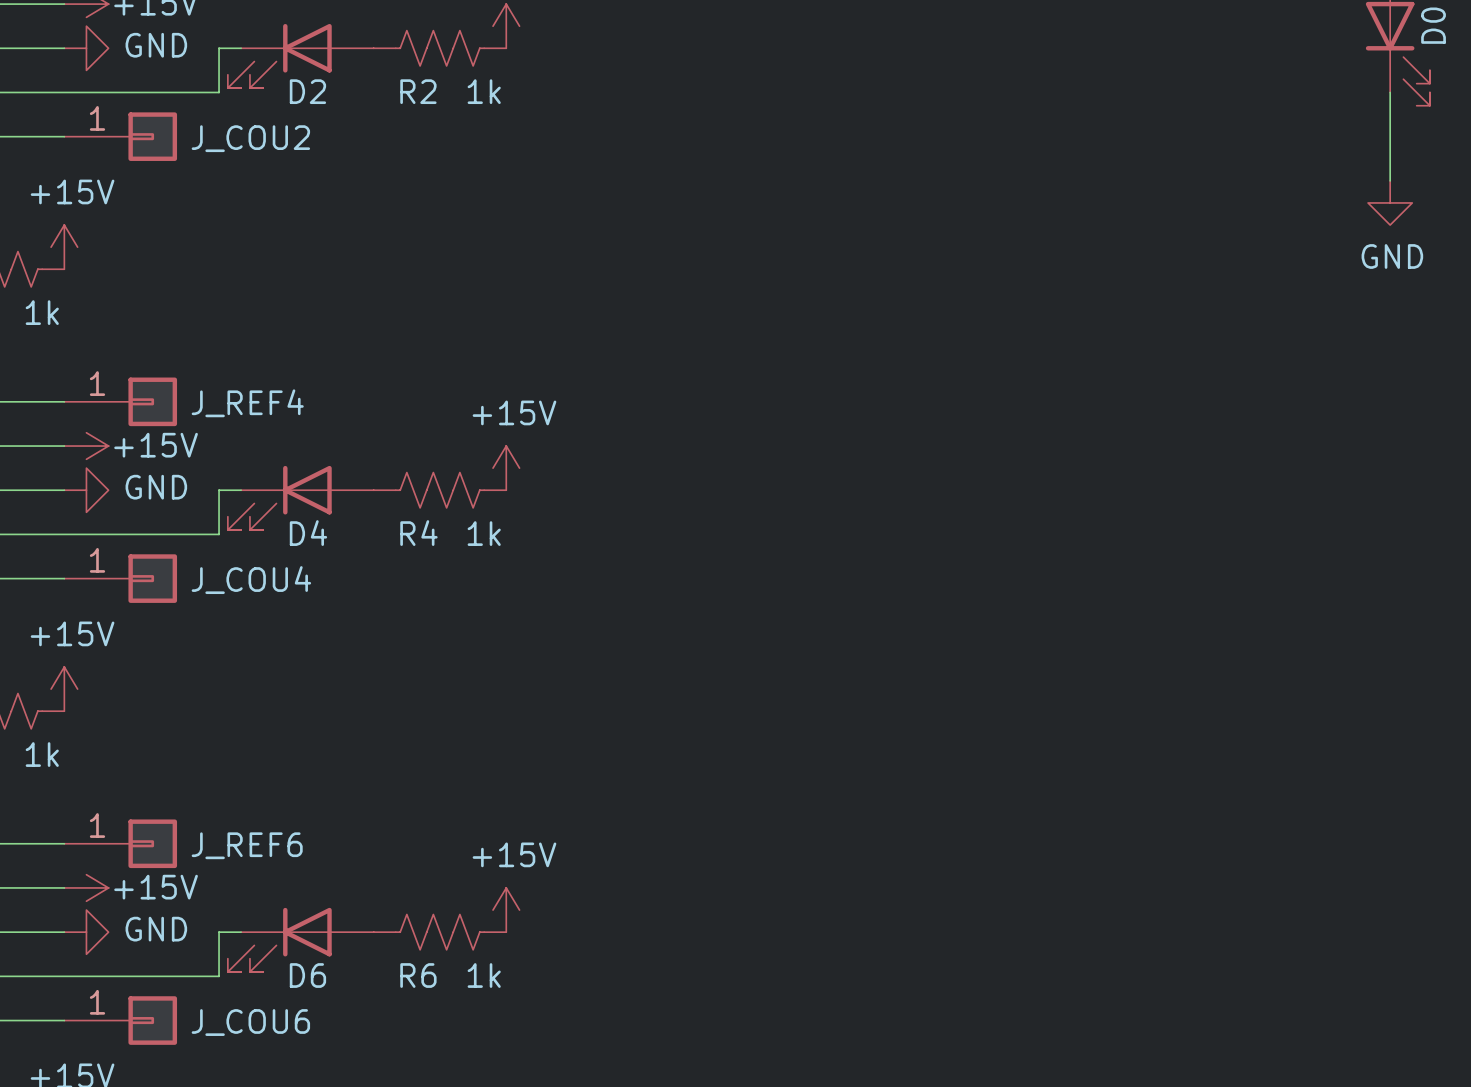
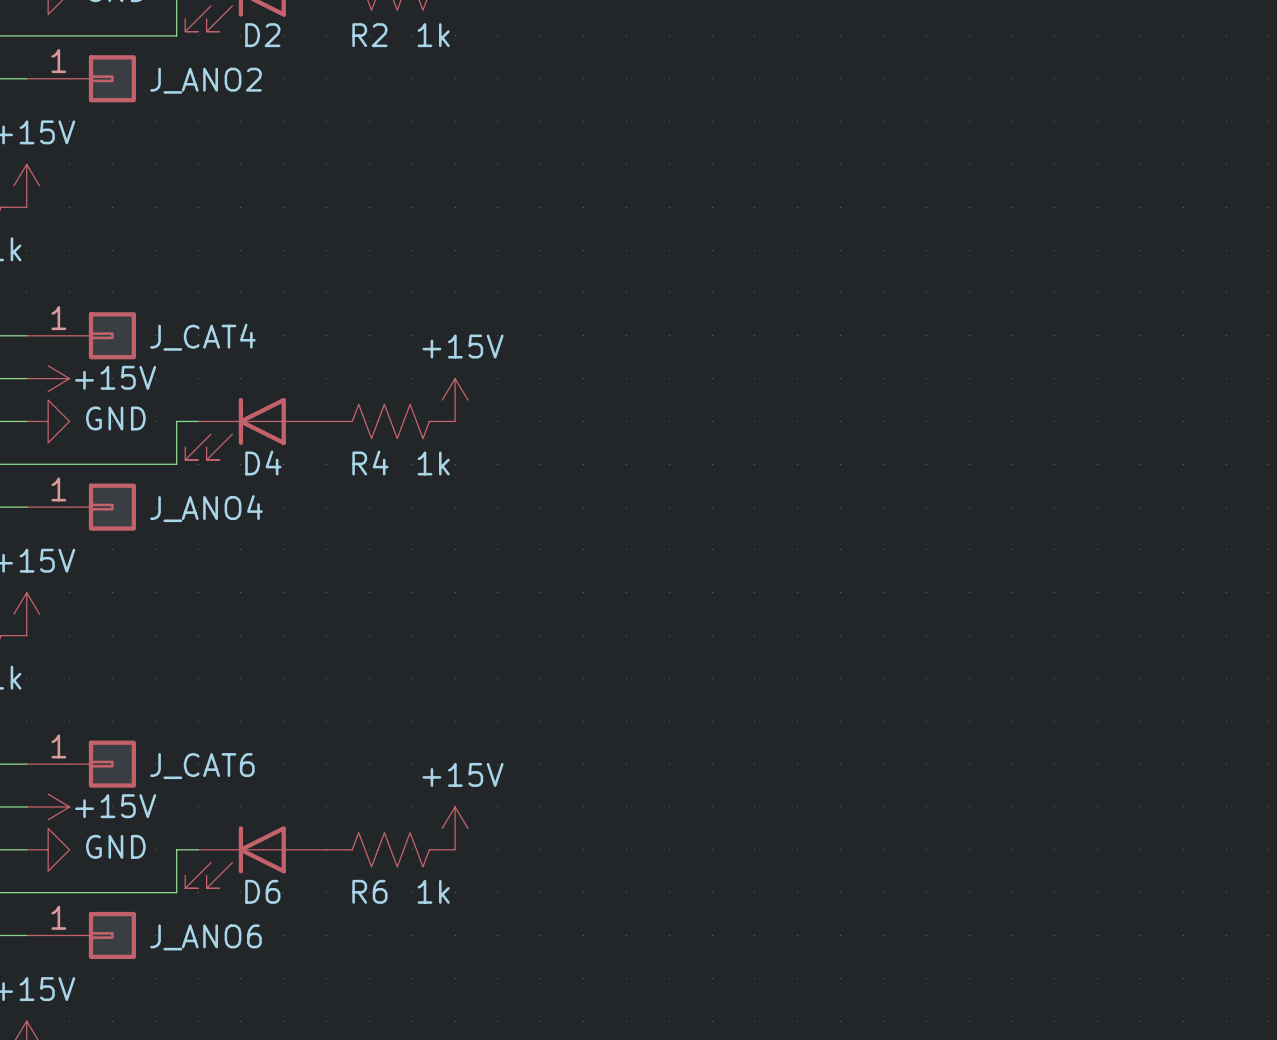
J_COU2 name: J_COU2 (250, 138) -> J_ANO2 (205, 80)
J_REF4 name: J_REF4 (247, 403) -> J_CAT4 (202, 337)
J_COU4 name: J_COU4 (251, 580) -> J_ANO4 (206, 508)
J_REF6 name: J_REF6 (247, 845) -> J_CAT6 (202, 766)
J_COU6 name: J_COU6 (250, 1022) -> J_ANO6 (205, 937)

